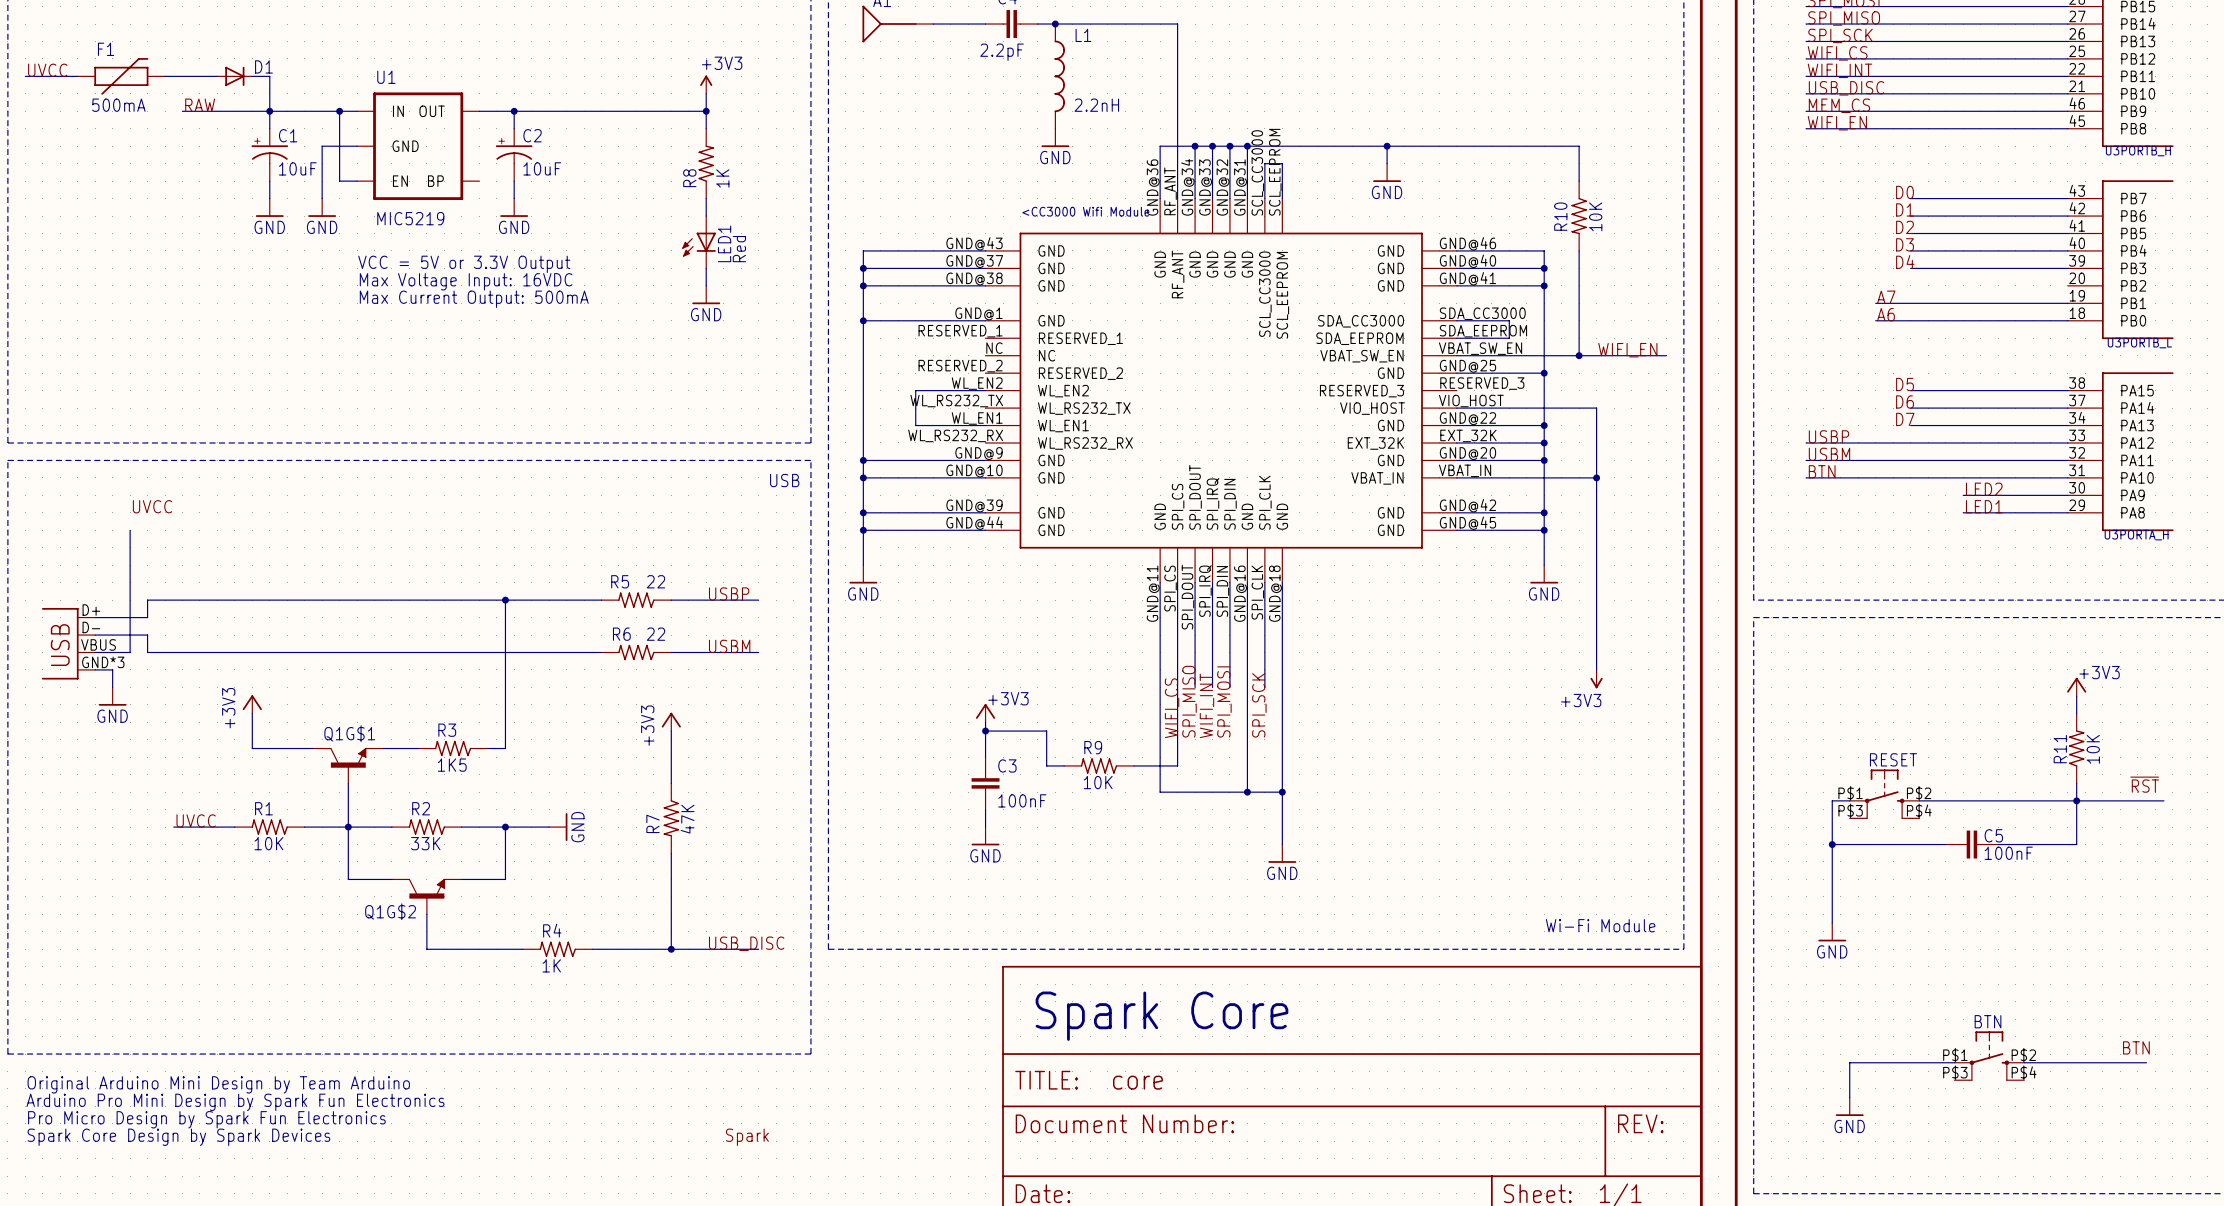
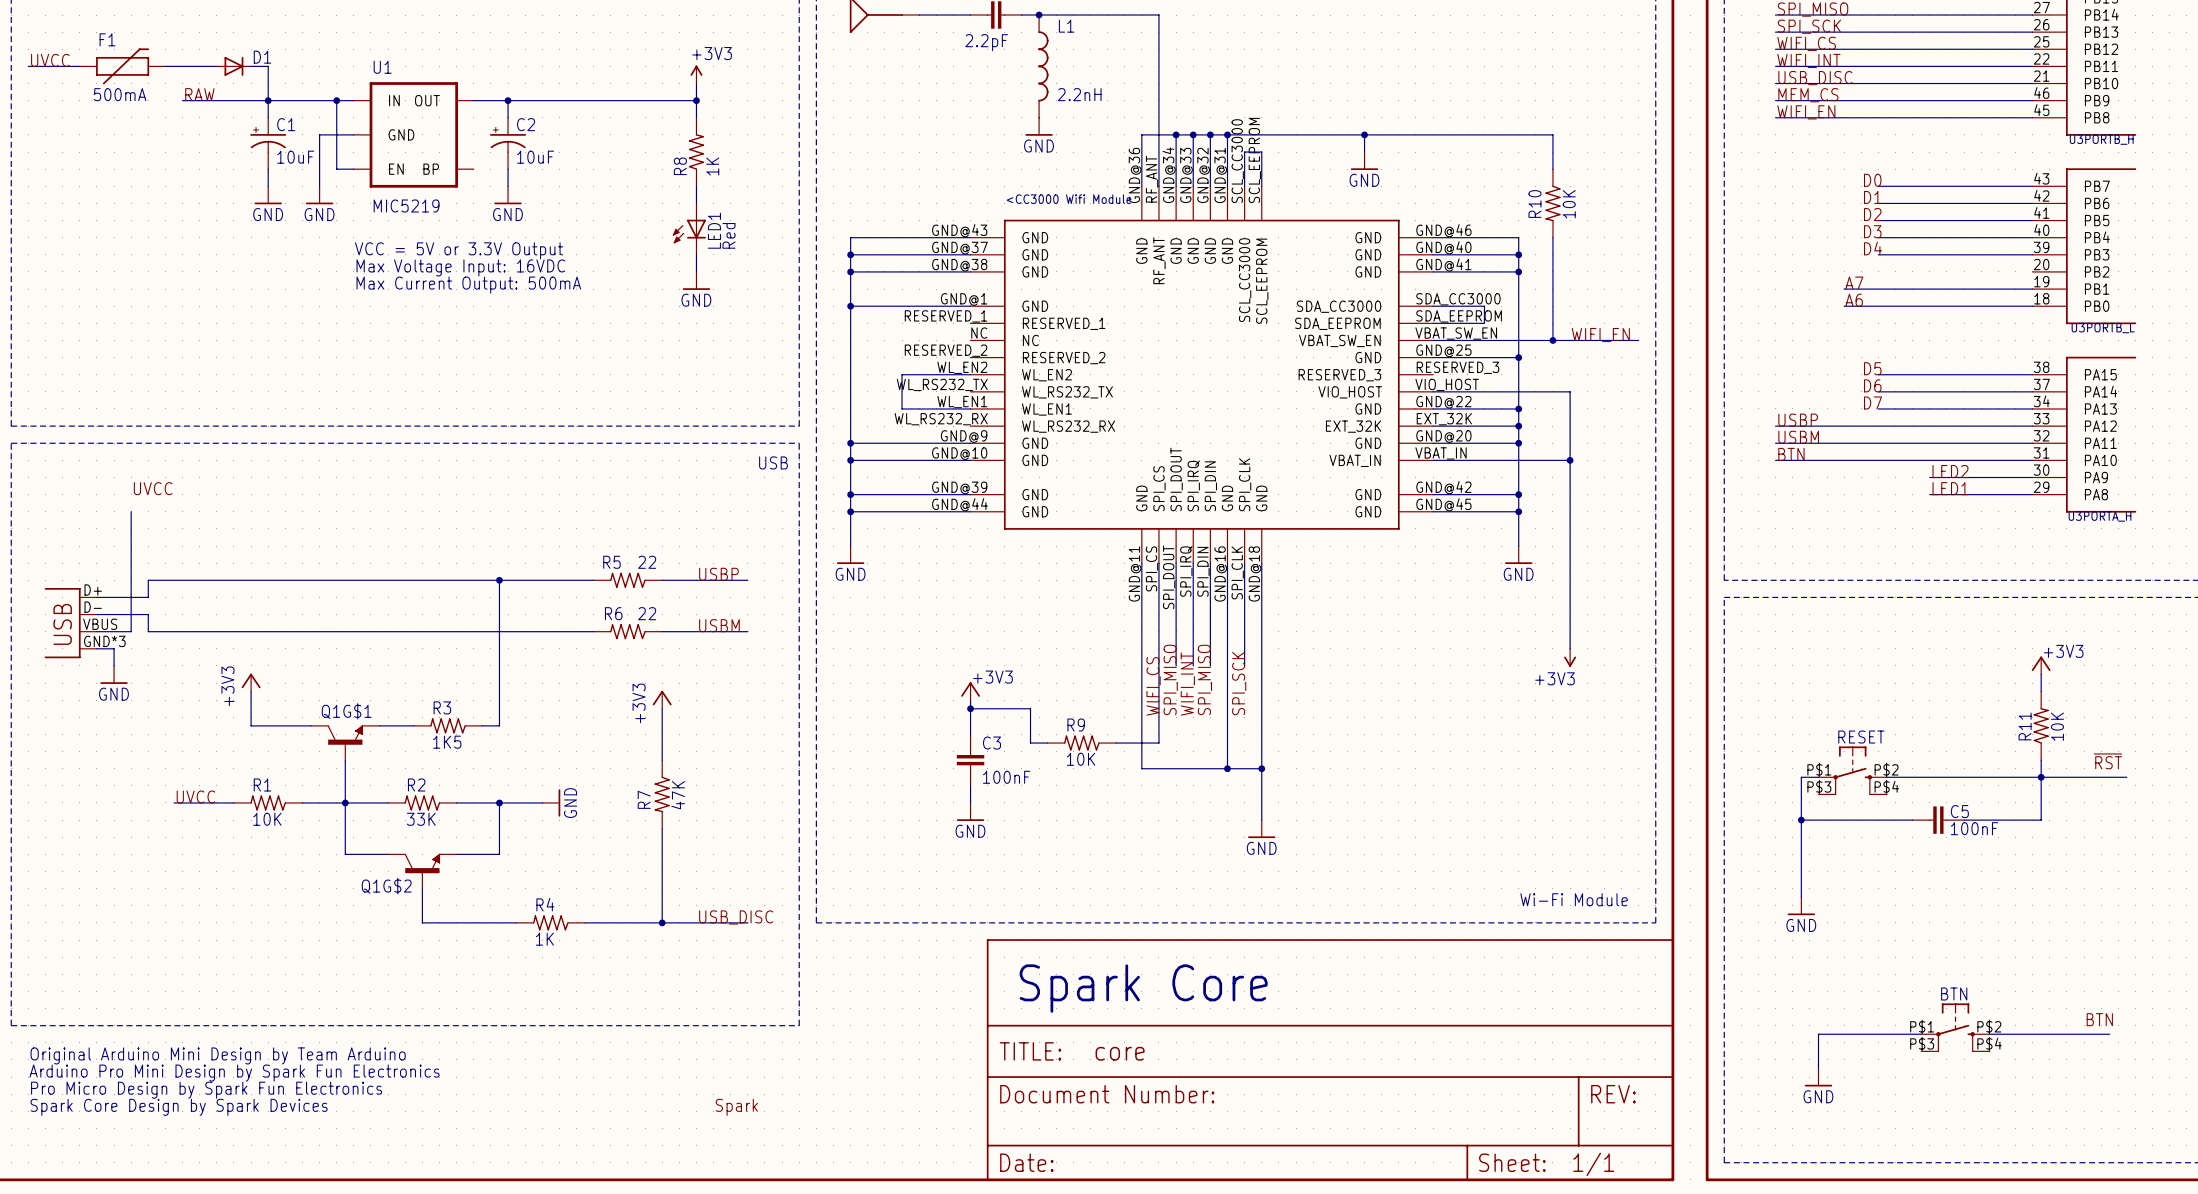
label: SPI_MOSI (1224, 701) -> SPI_MISO (1204, 679)

